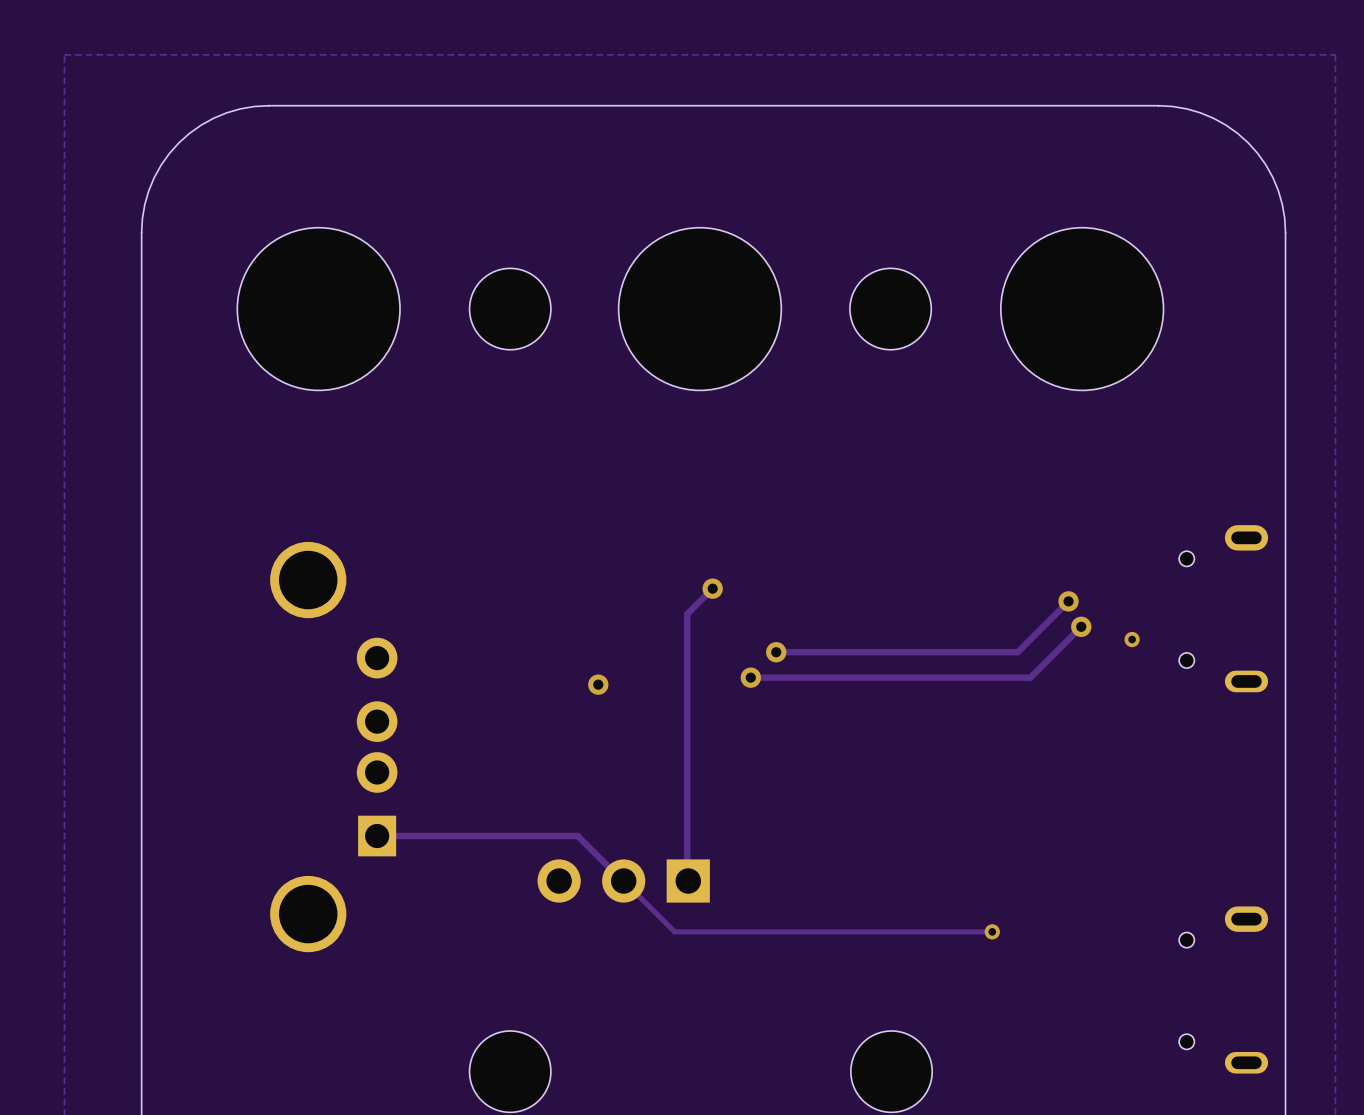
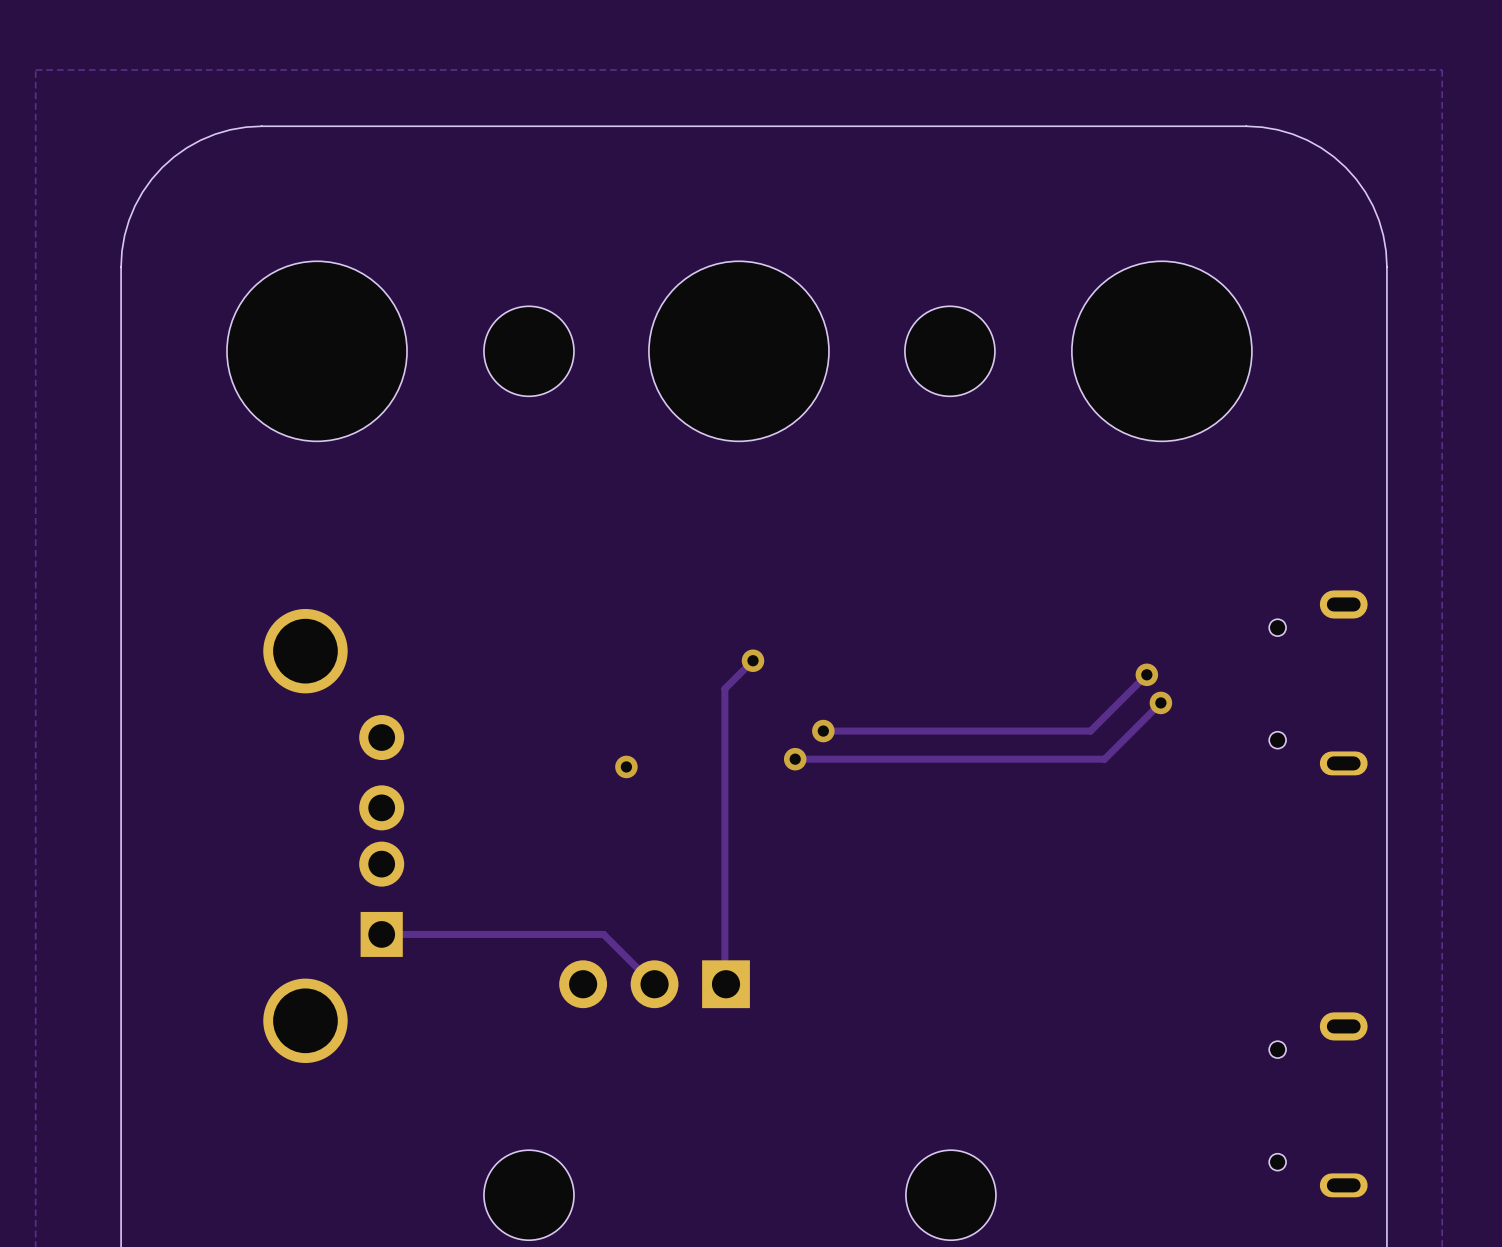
via: (1132, 639) -> none
track: (623, 881) (674, 931) (992, 931) -> none
via: (992, 931) -> none

